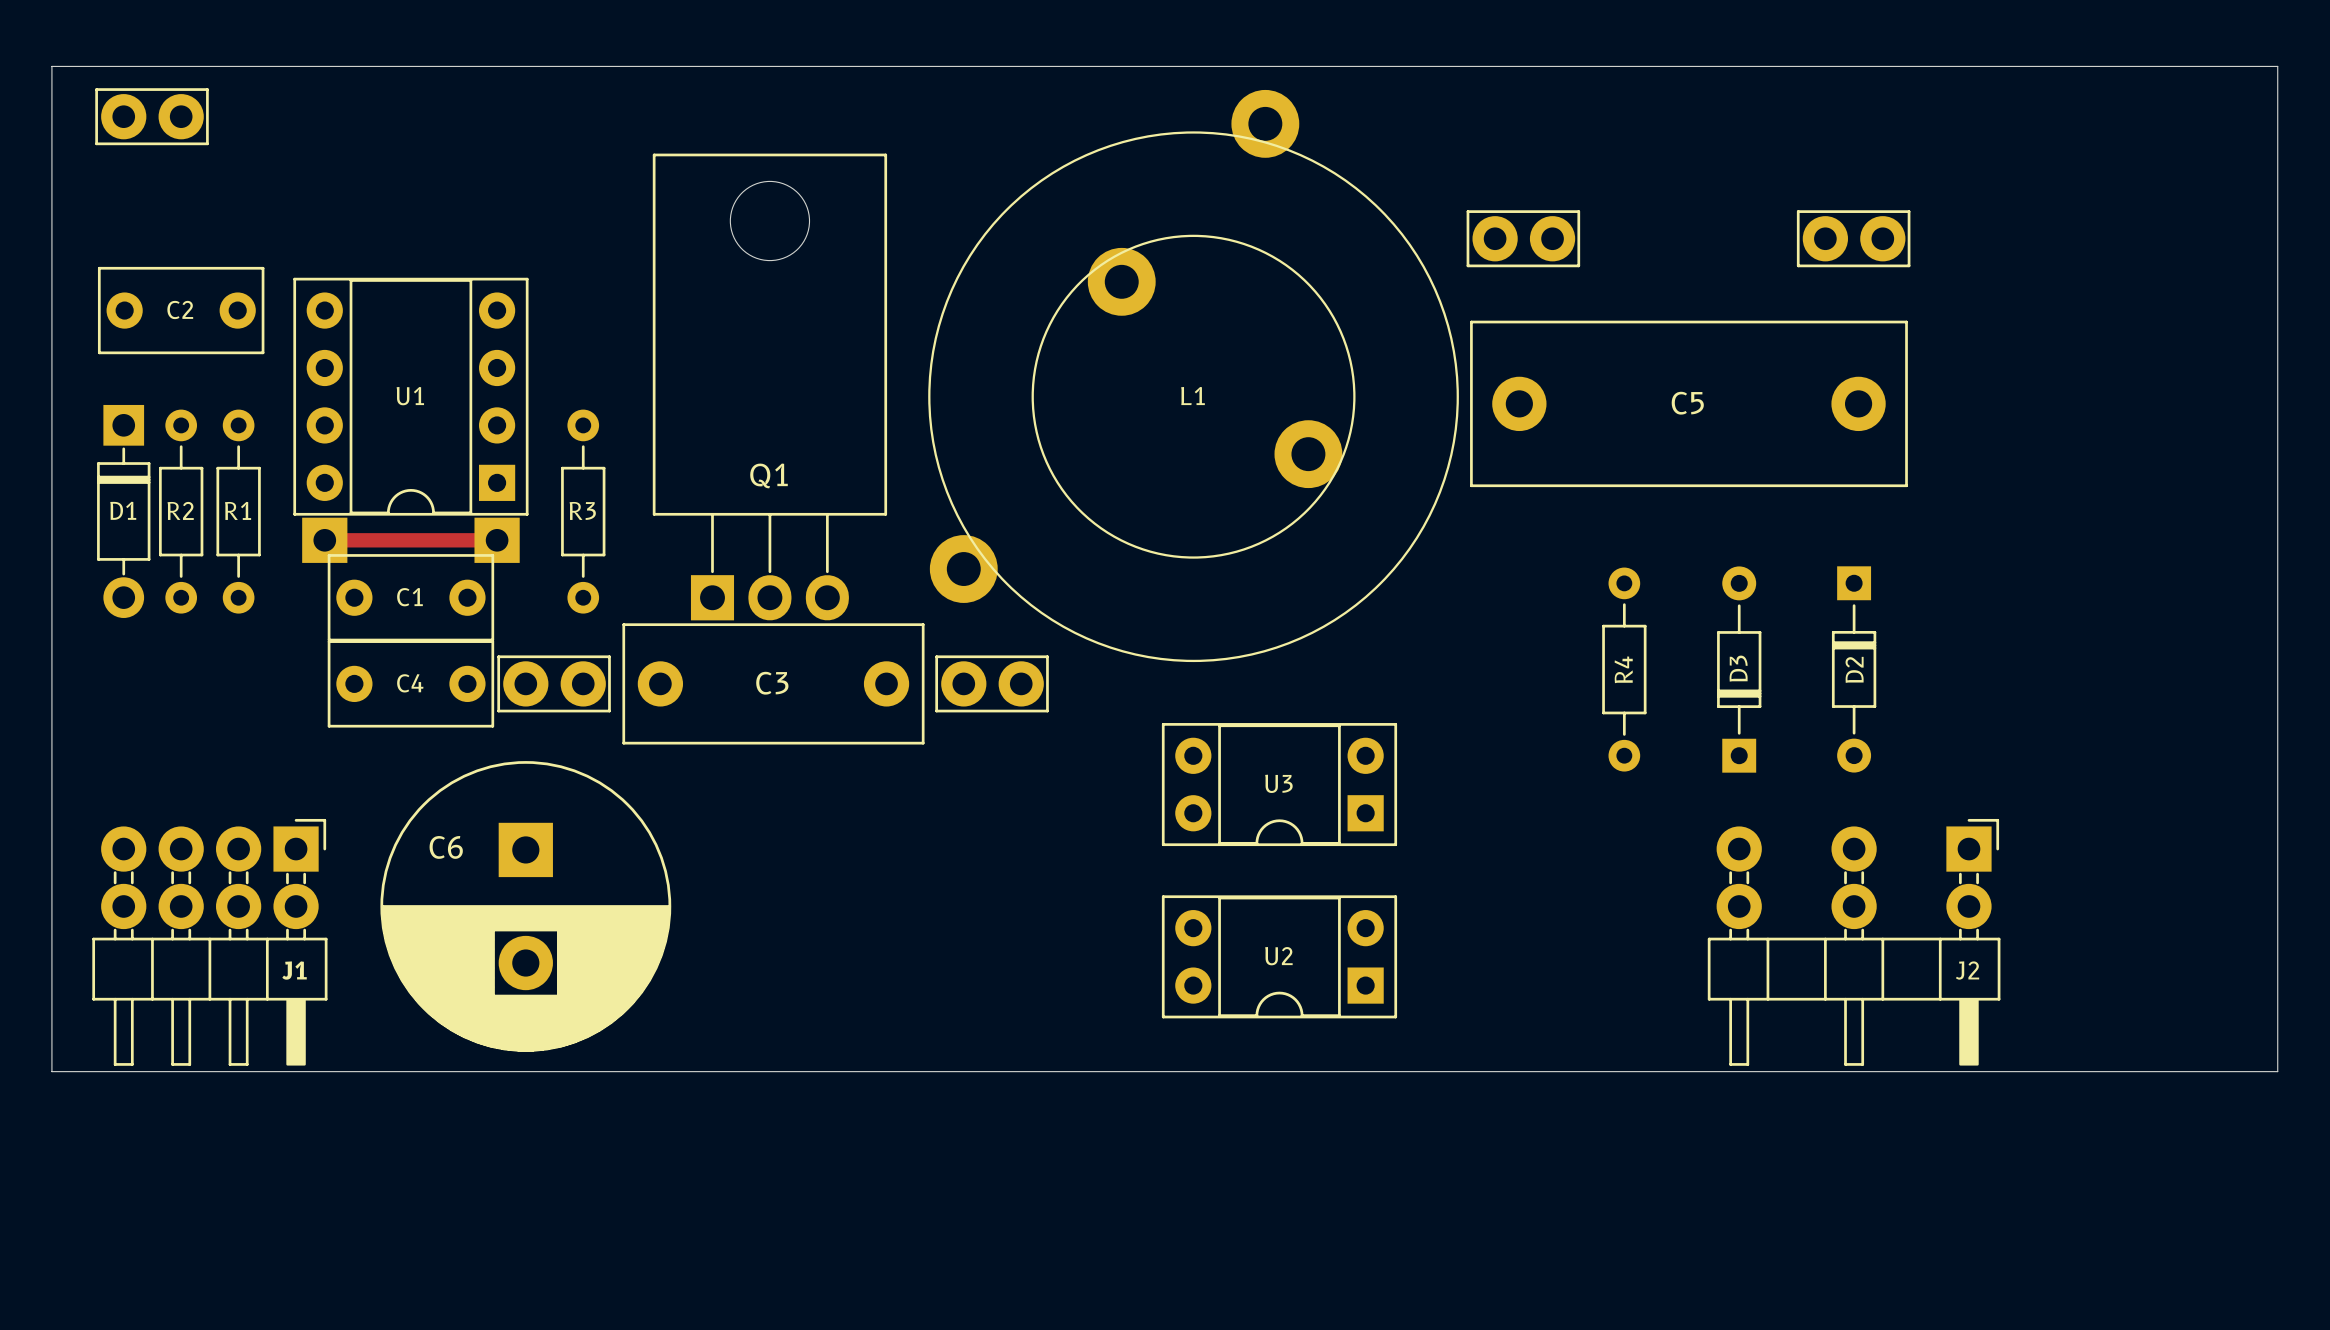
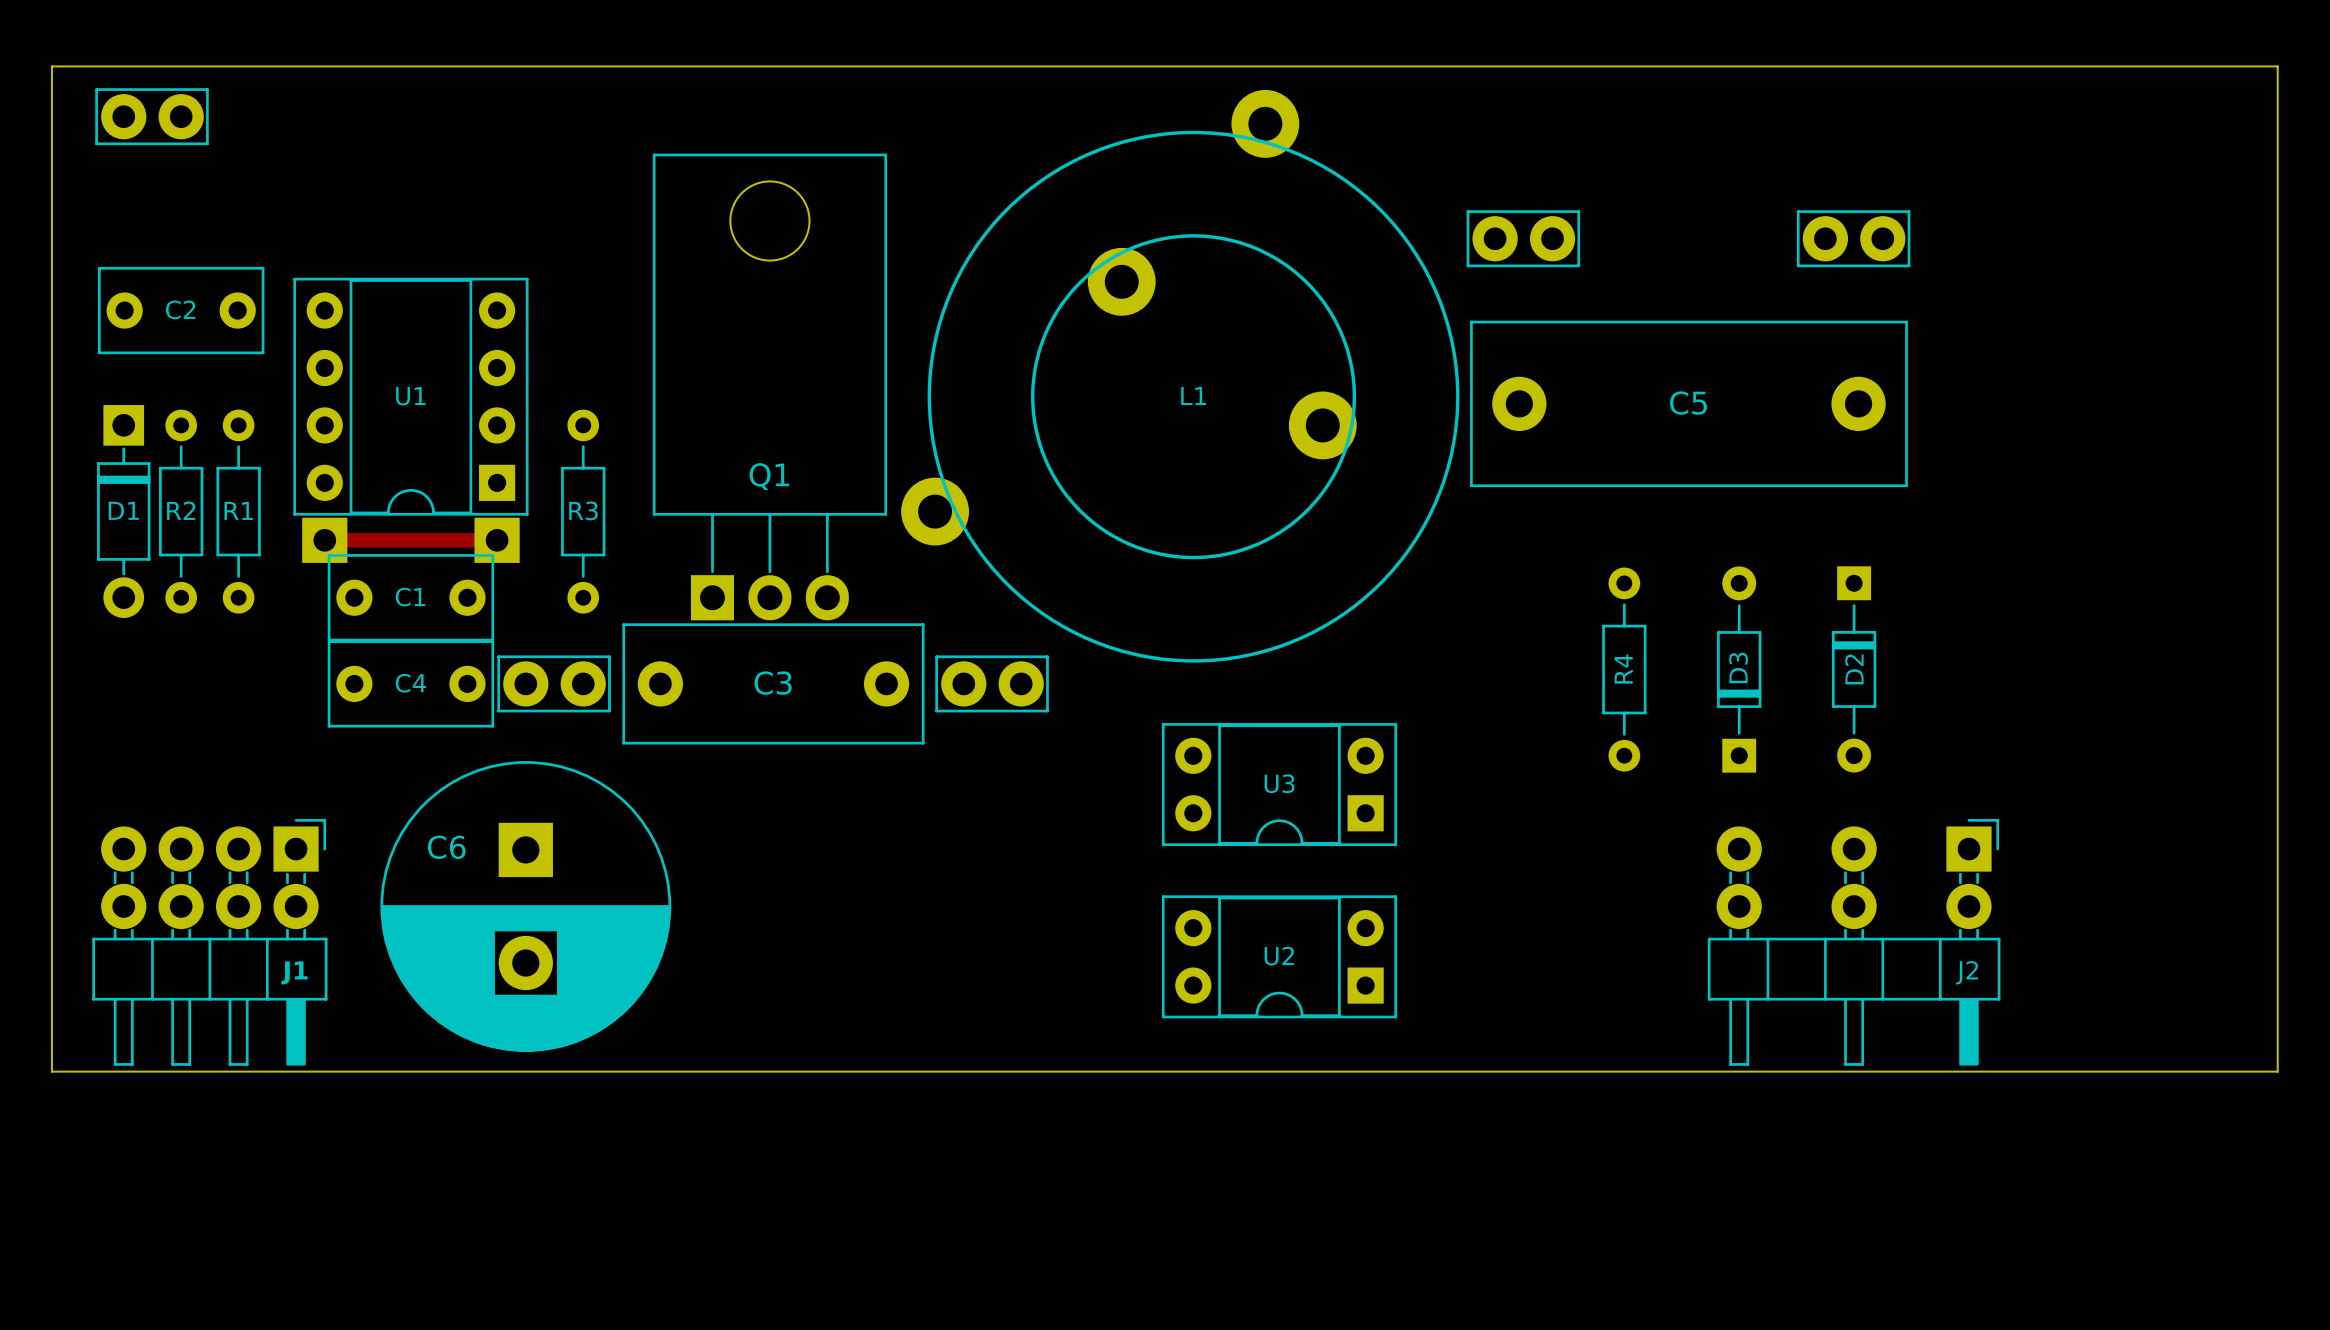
L1 footprint: [928, 89, 1459, 663] -> [901, 89, 1460, 663]

